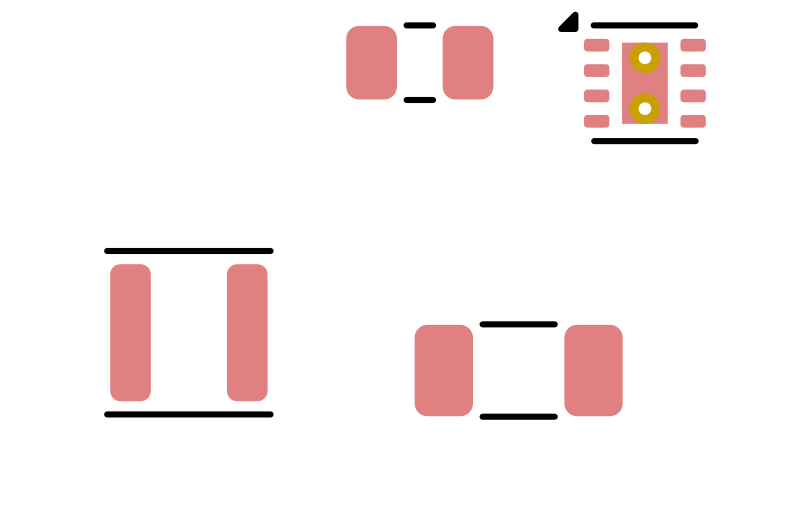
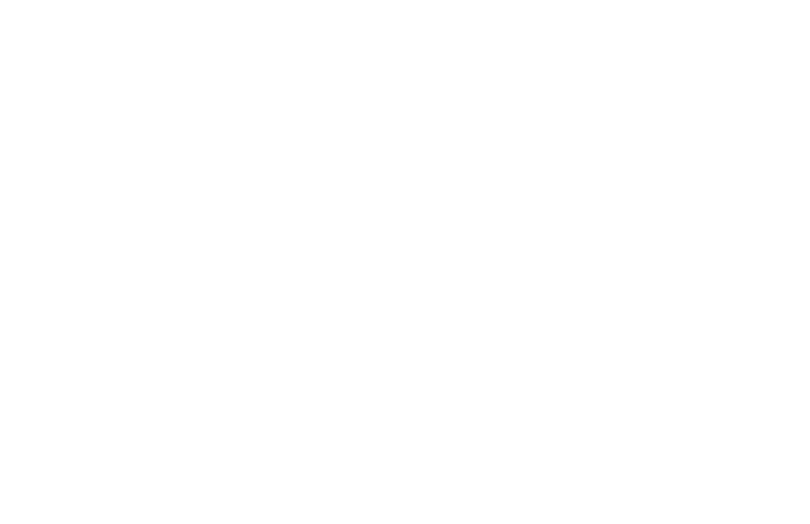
part: (419, 62) -> none
part: (631, 77) -> none
part: (188, 332) -> none
part: (518, 370) -> none

